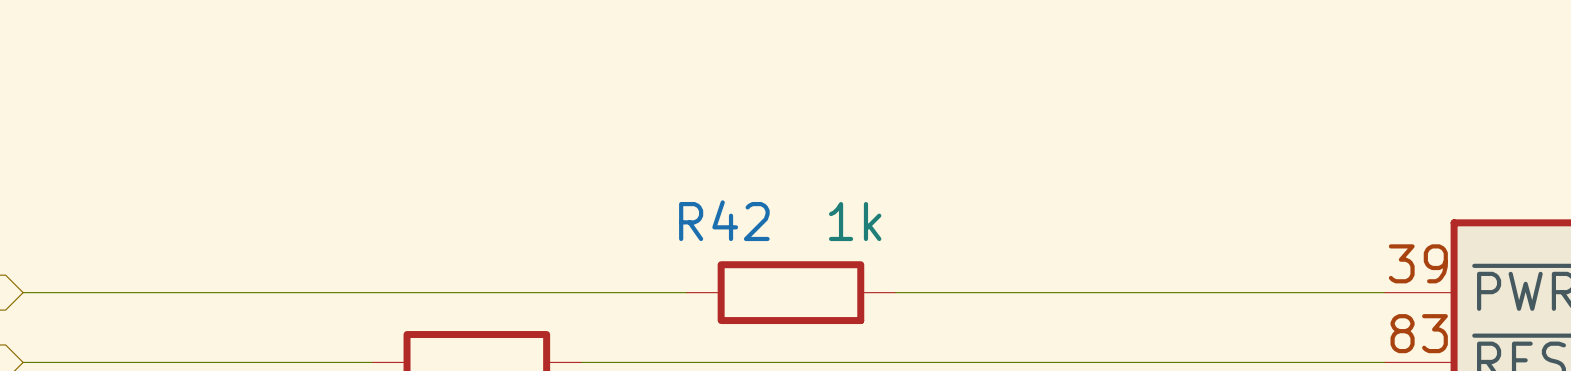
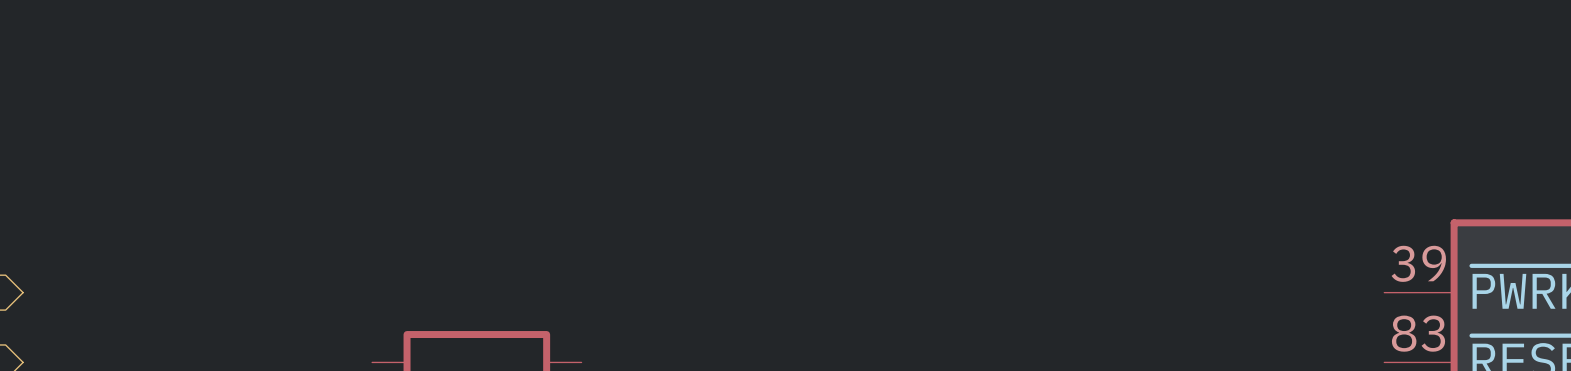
wire: (23, 292) (686, 292) -> none
R42: 1k (790, 292) -> none
wire: (895, 292) (1384, 292) -> none
wire: (23, 362) (372, 362) -> none
wire: (581, 362) (1384, 362) -> none

